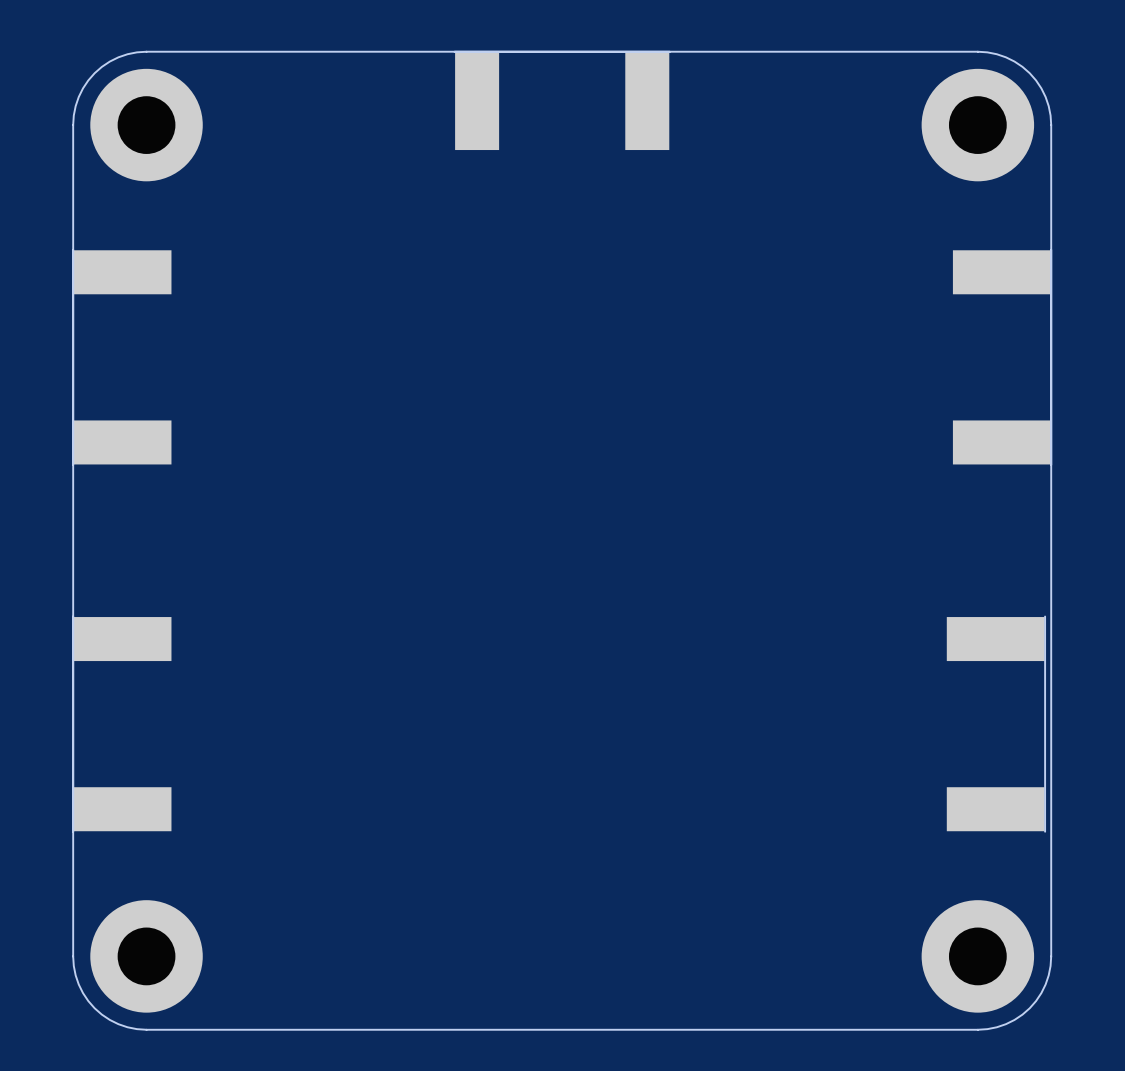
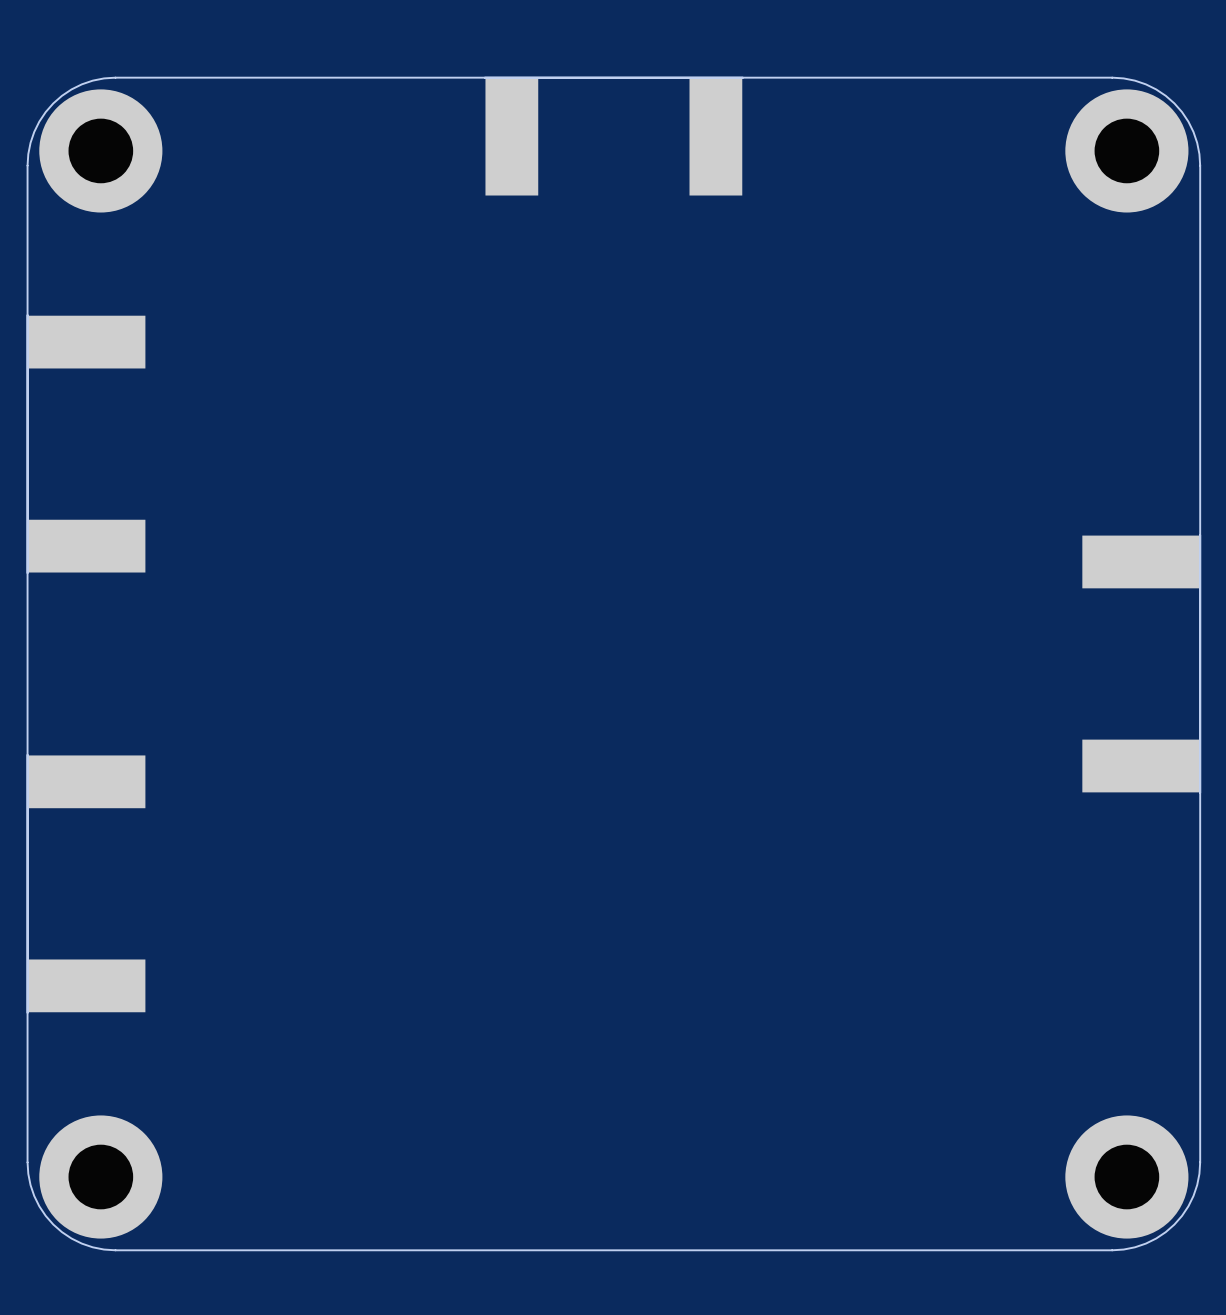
part footprint: [90, 68, 203, 182] -> [39, 89, 163, 213]
part footprint: [921, 68, 1035, 182] -> [1065, 89, 1189, 213]
part: (1002, 357) -> none
part: none -> (1141, 663)
part: (995, 724) -> none
part footprint: [90, 900, 203, 1013] -> [39, 1115, 163, 1239]
part footprint: [921, 900, 1035, 1013] -> [1065, 1115, 1189, 1239]

